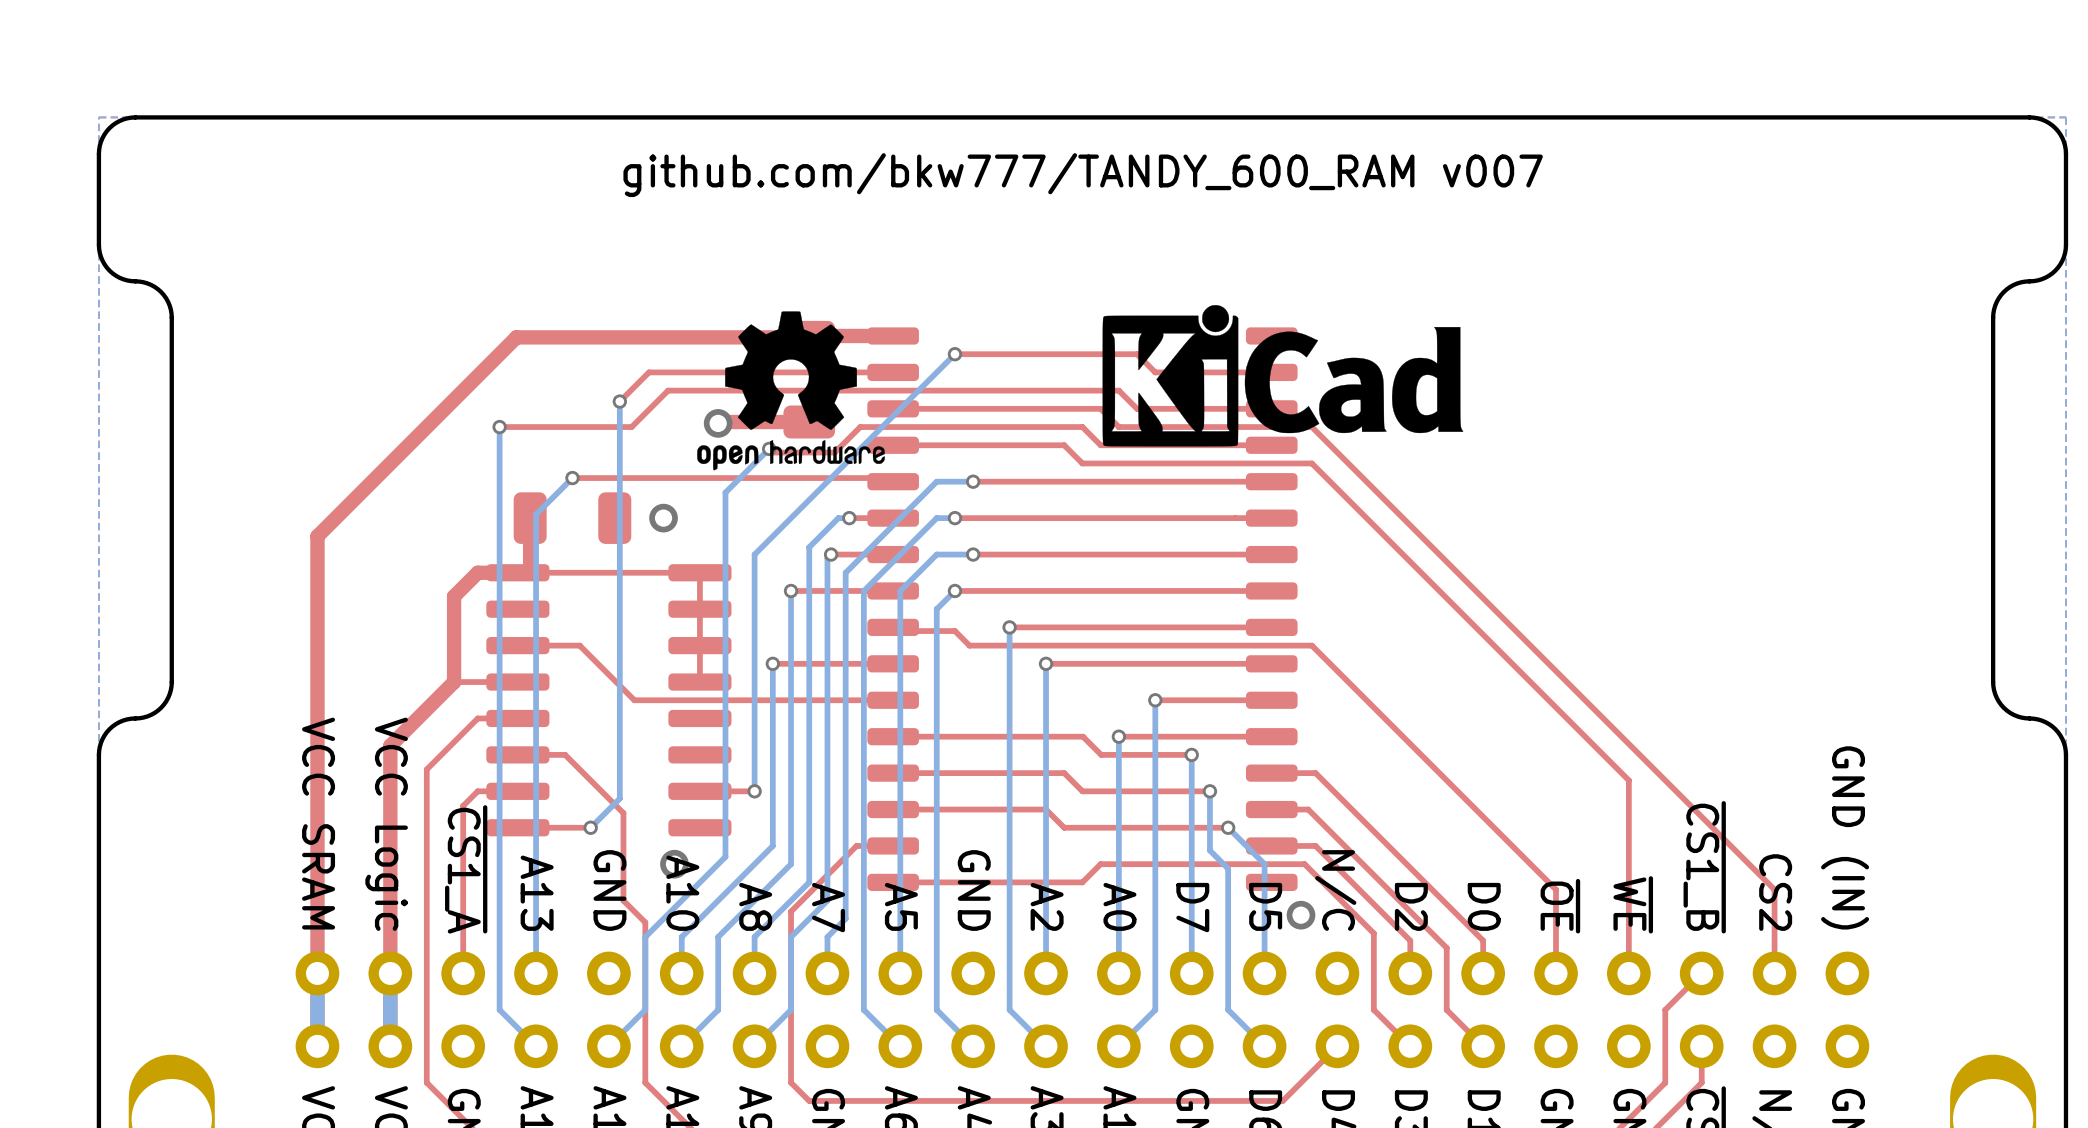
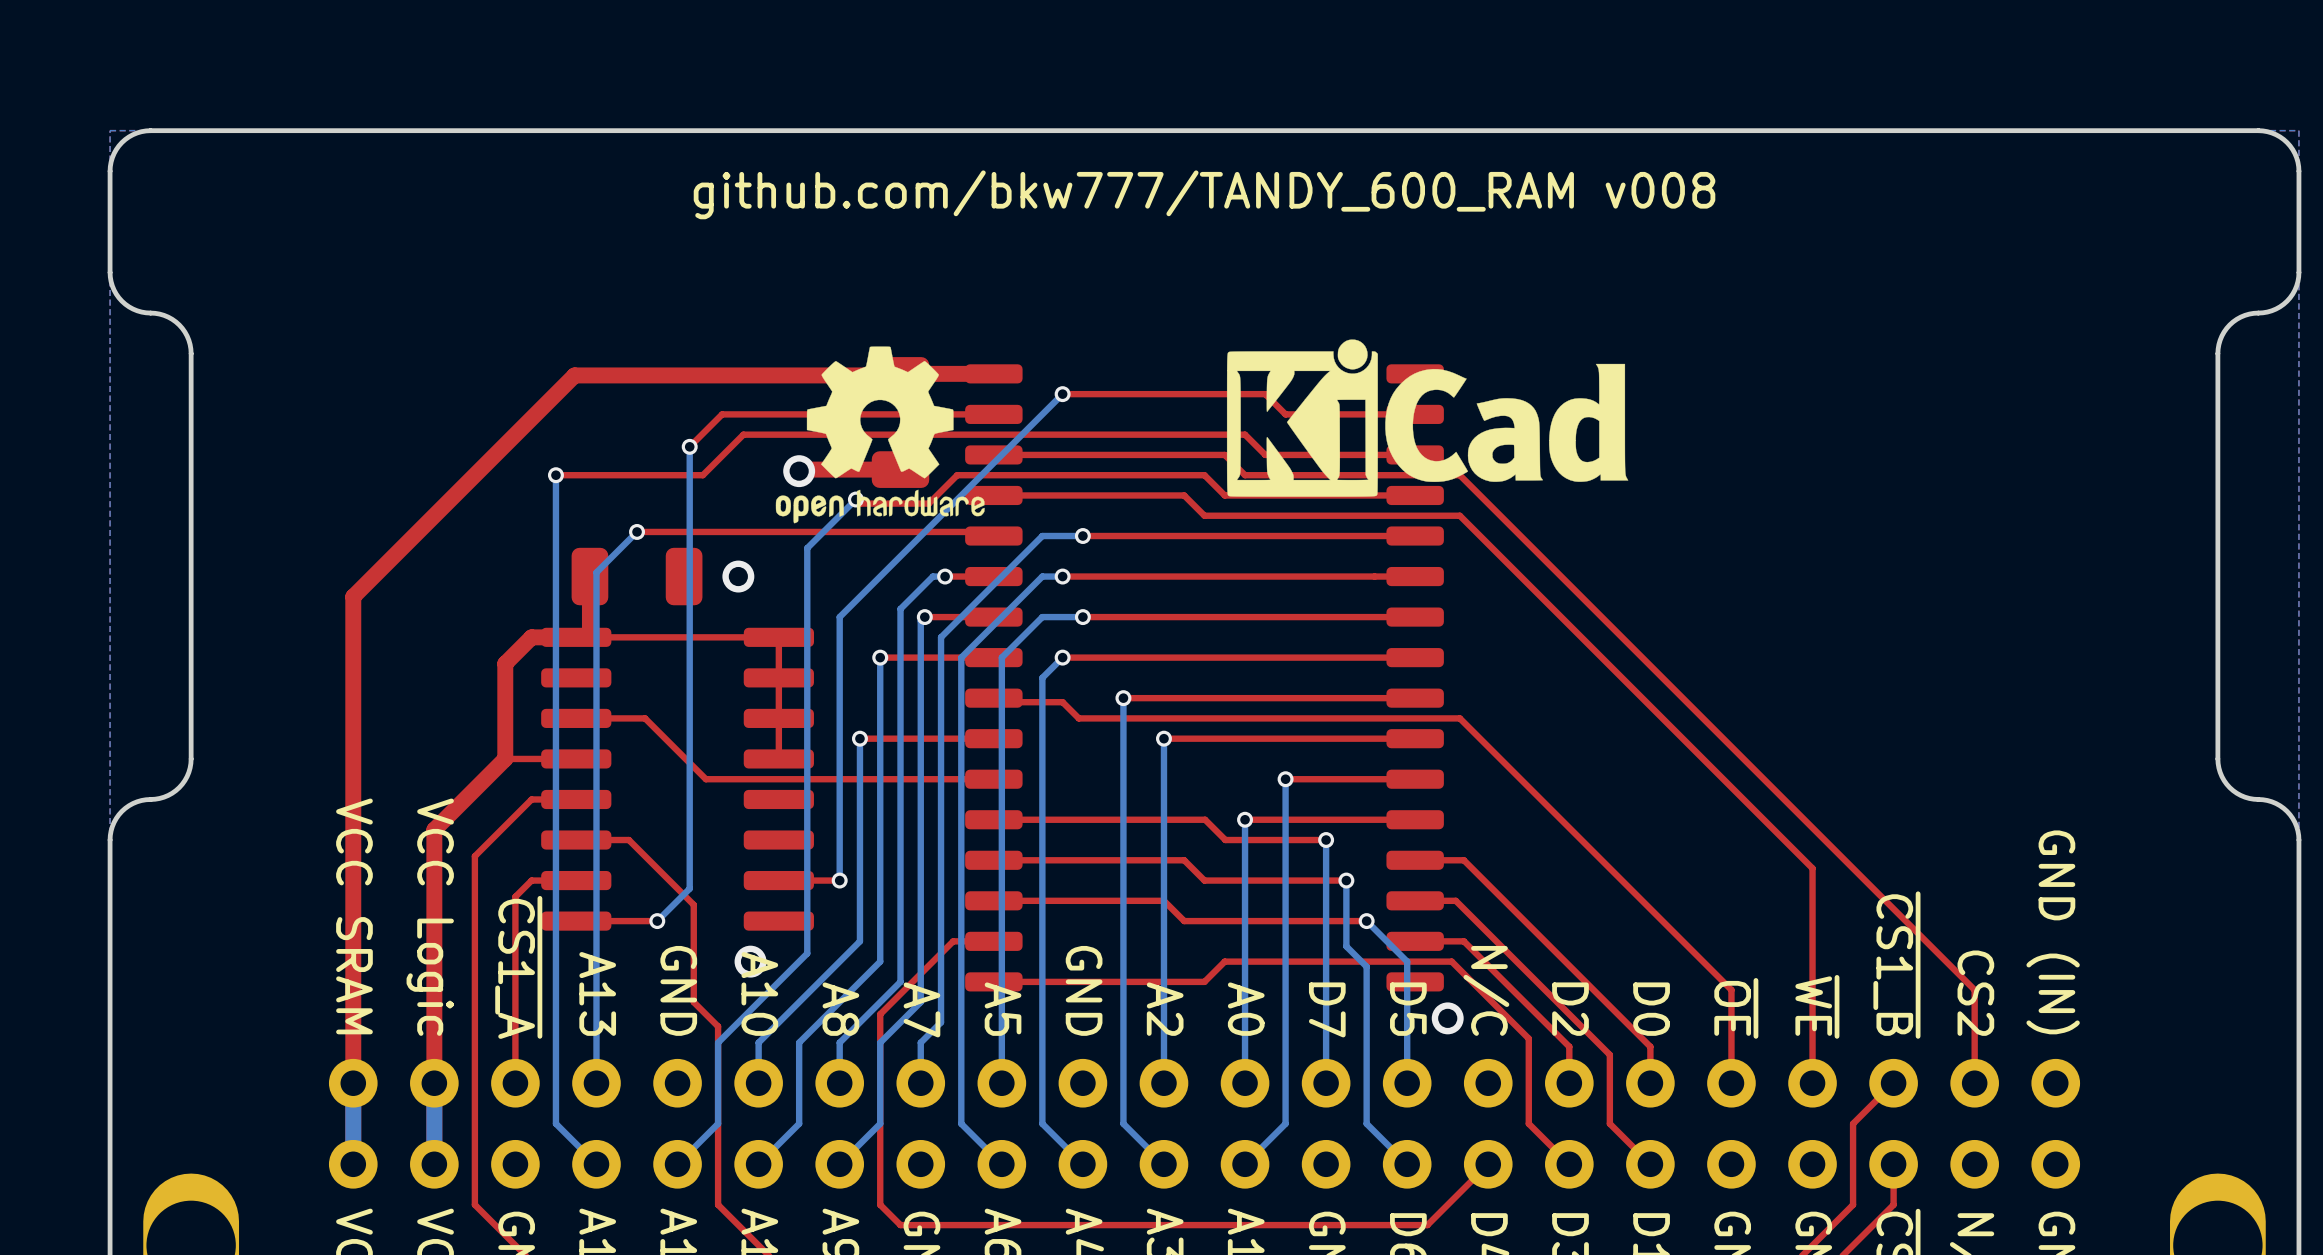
text: github.com/bkw777/TANDY_600_RAM v007 (1083, 175) -> github.com/bkw777/TANDY_600_RAM v008 (1204, 194)

